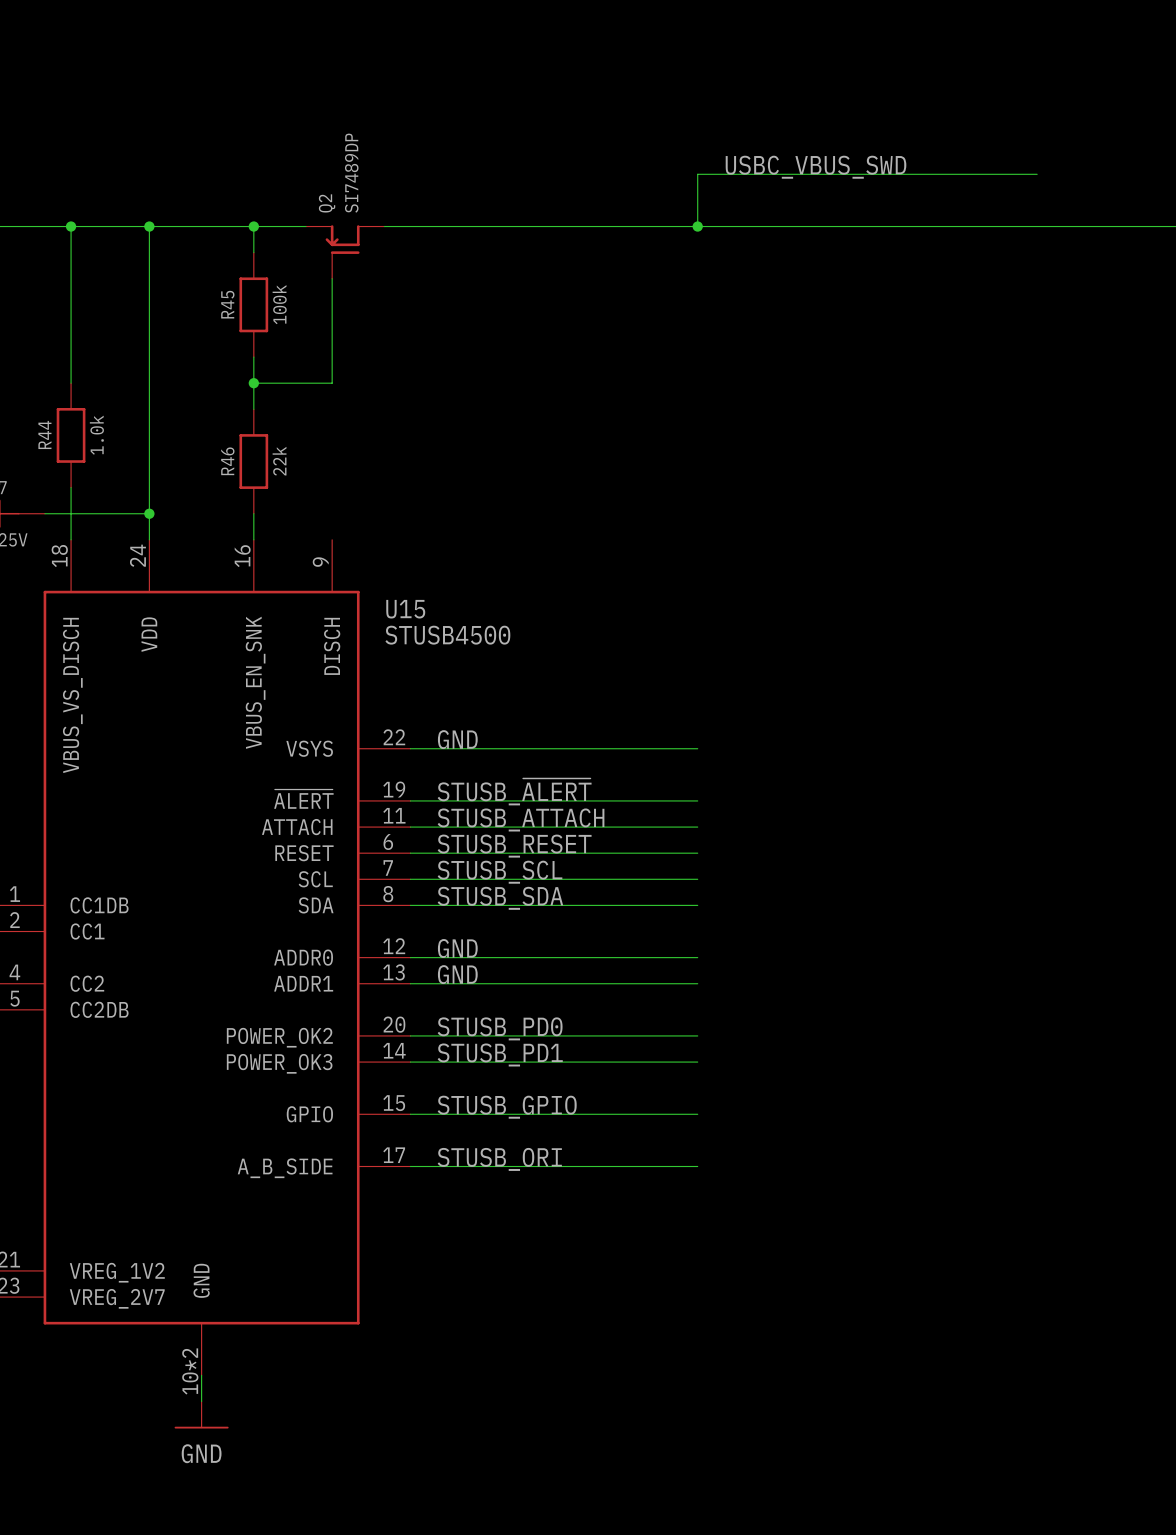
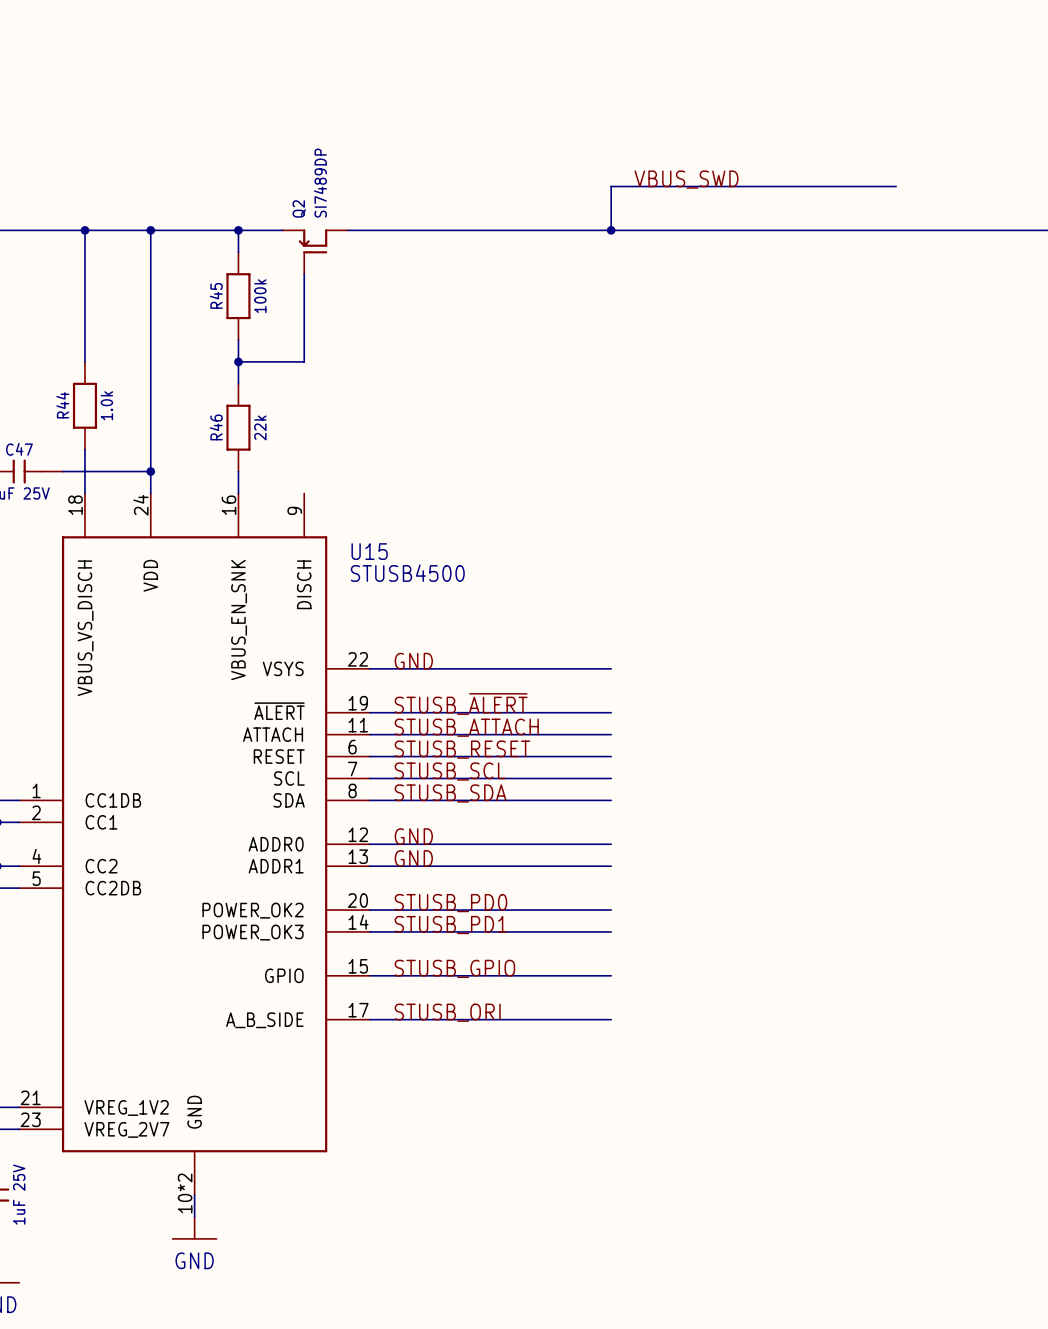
label: USBC_VBUS_SWD (816, 167) -> VBUS_SWD (686, 179)

